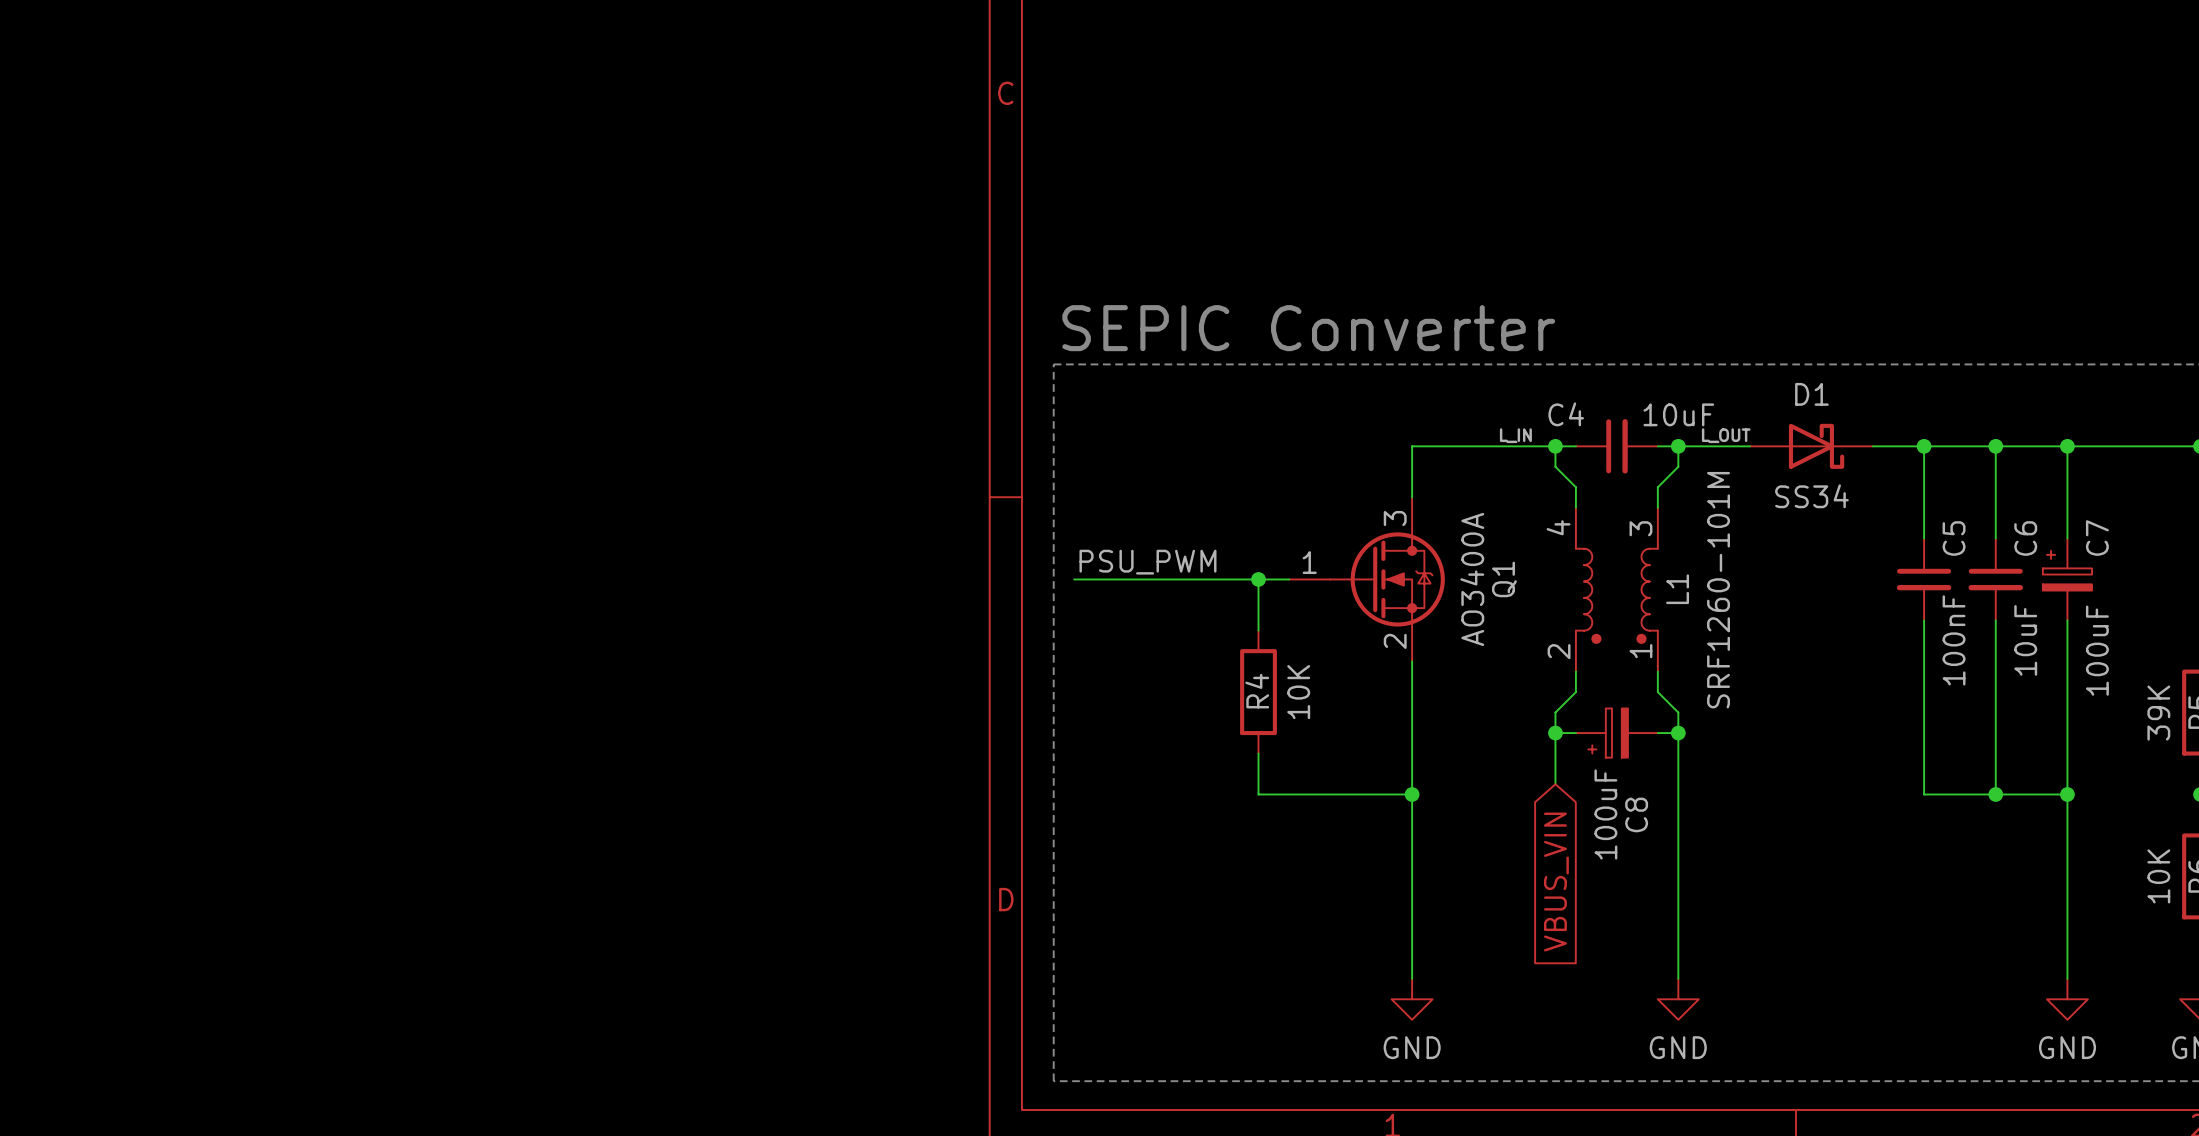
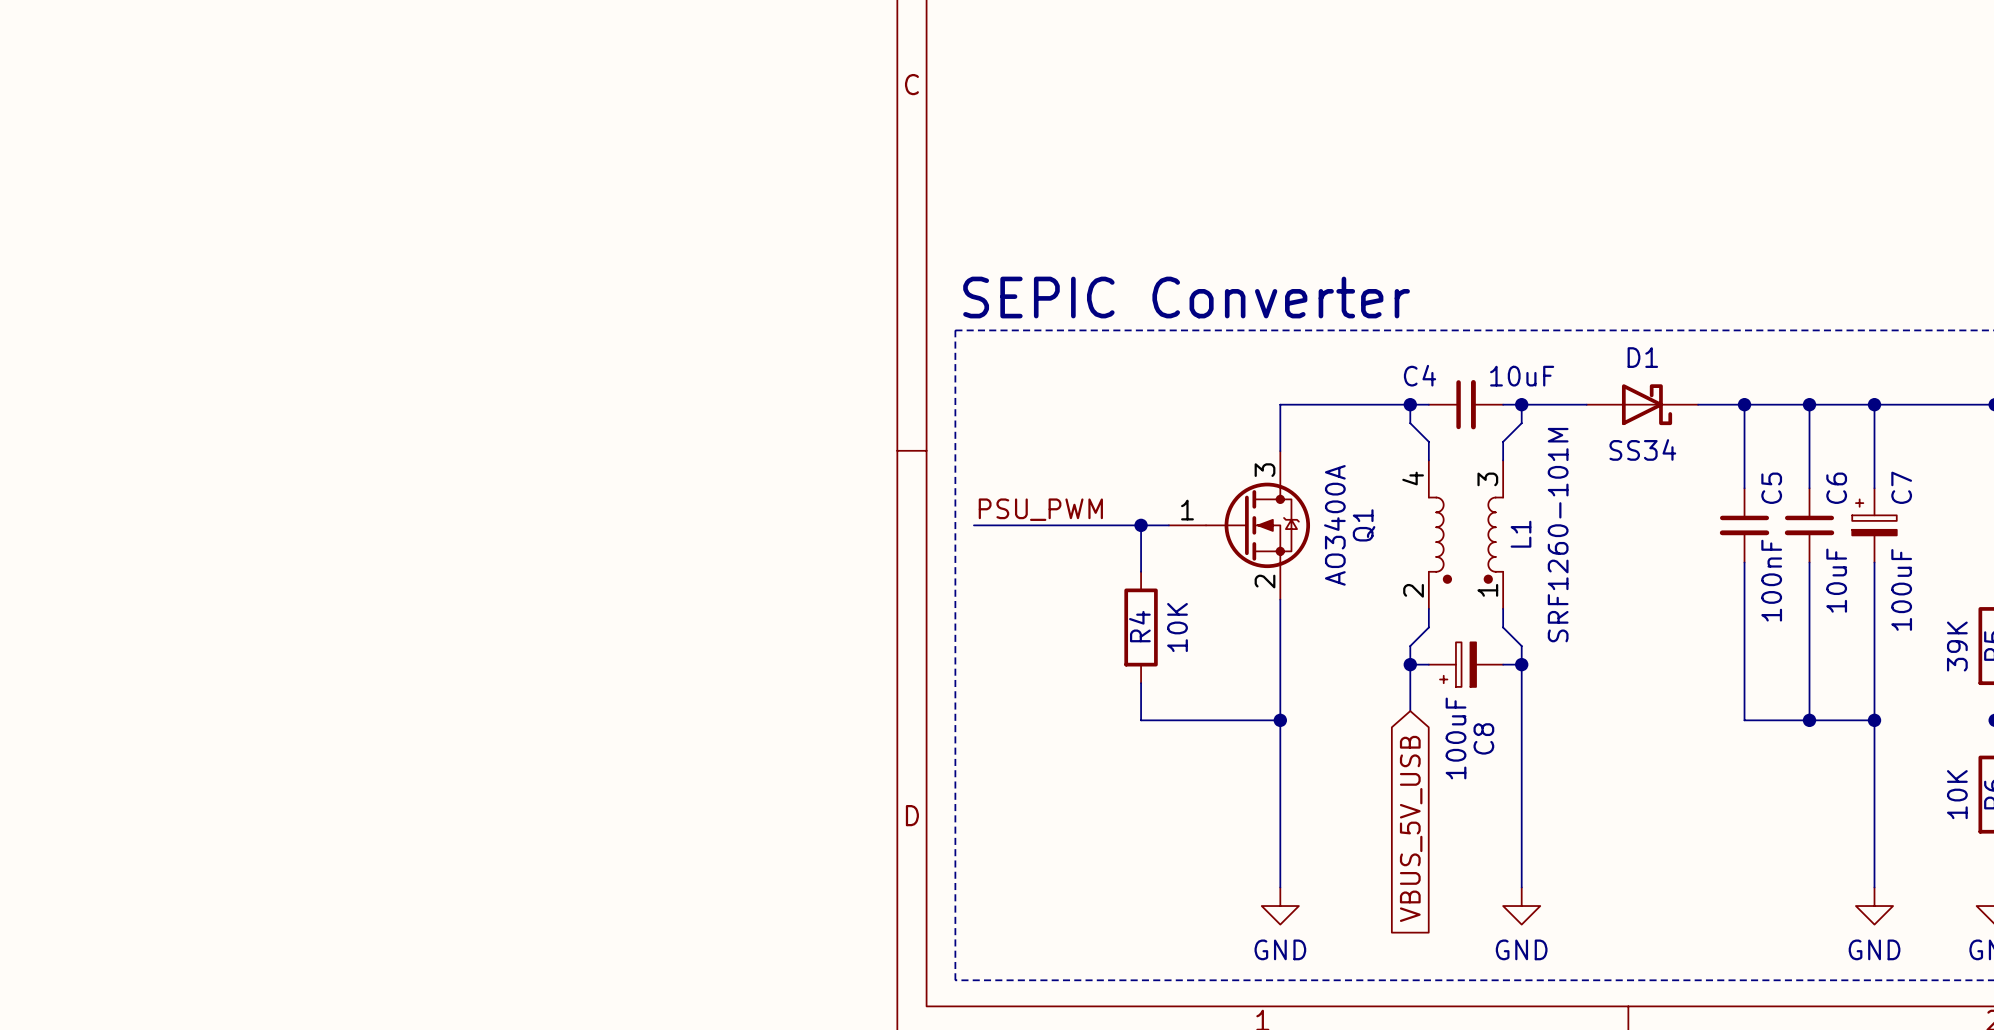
label: L_IN (1515, 435) -> none
label: L_OUT (1726, 435) -> none
global label: VBUS_VIN (1556, 882) -> VBUS_5V_USB (1411, 828)

